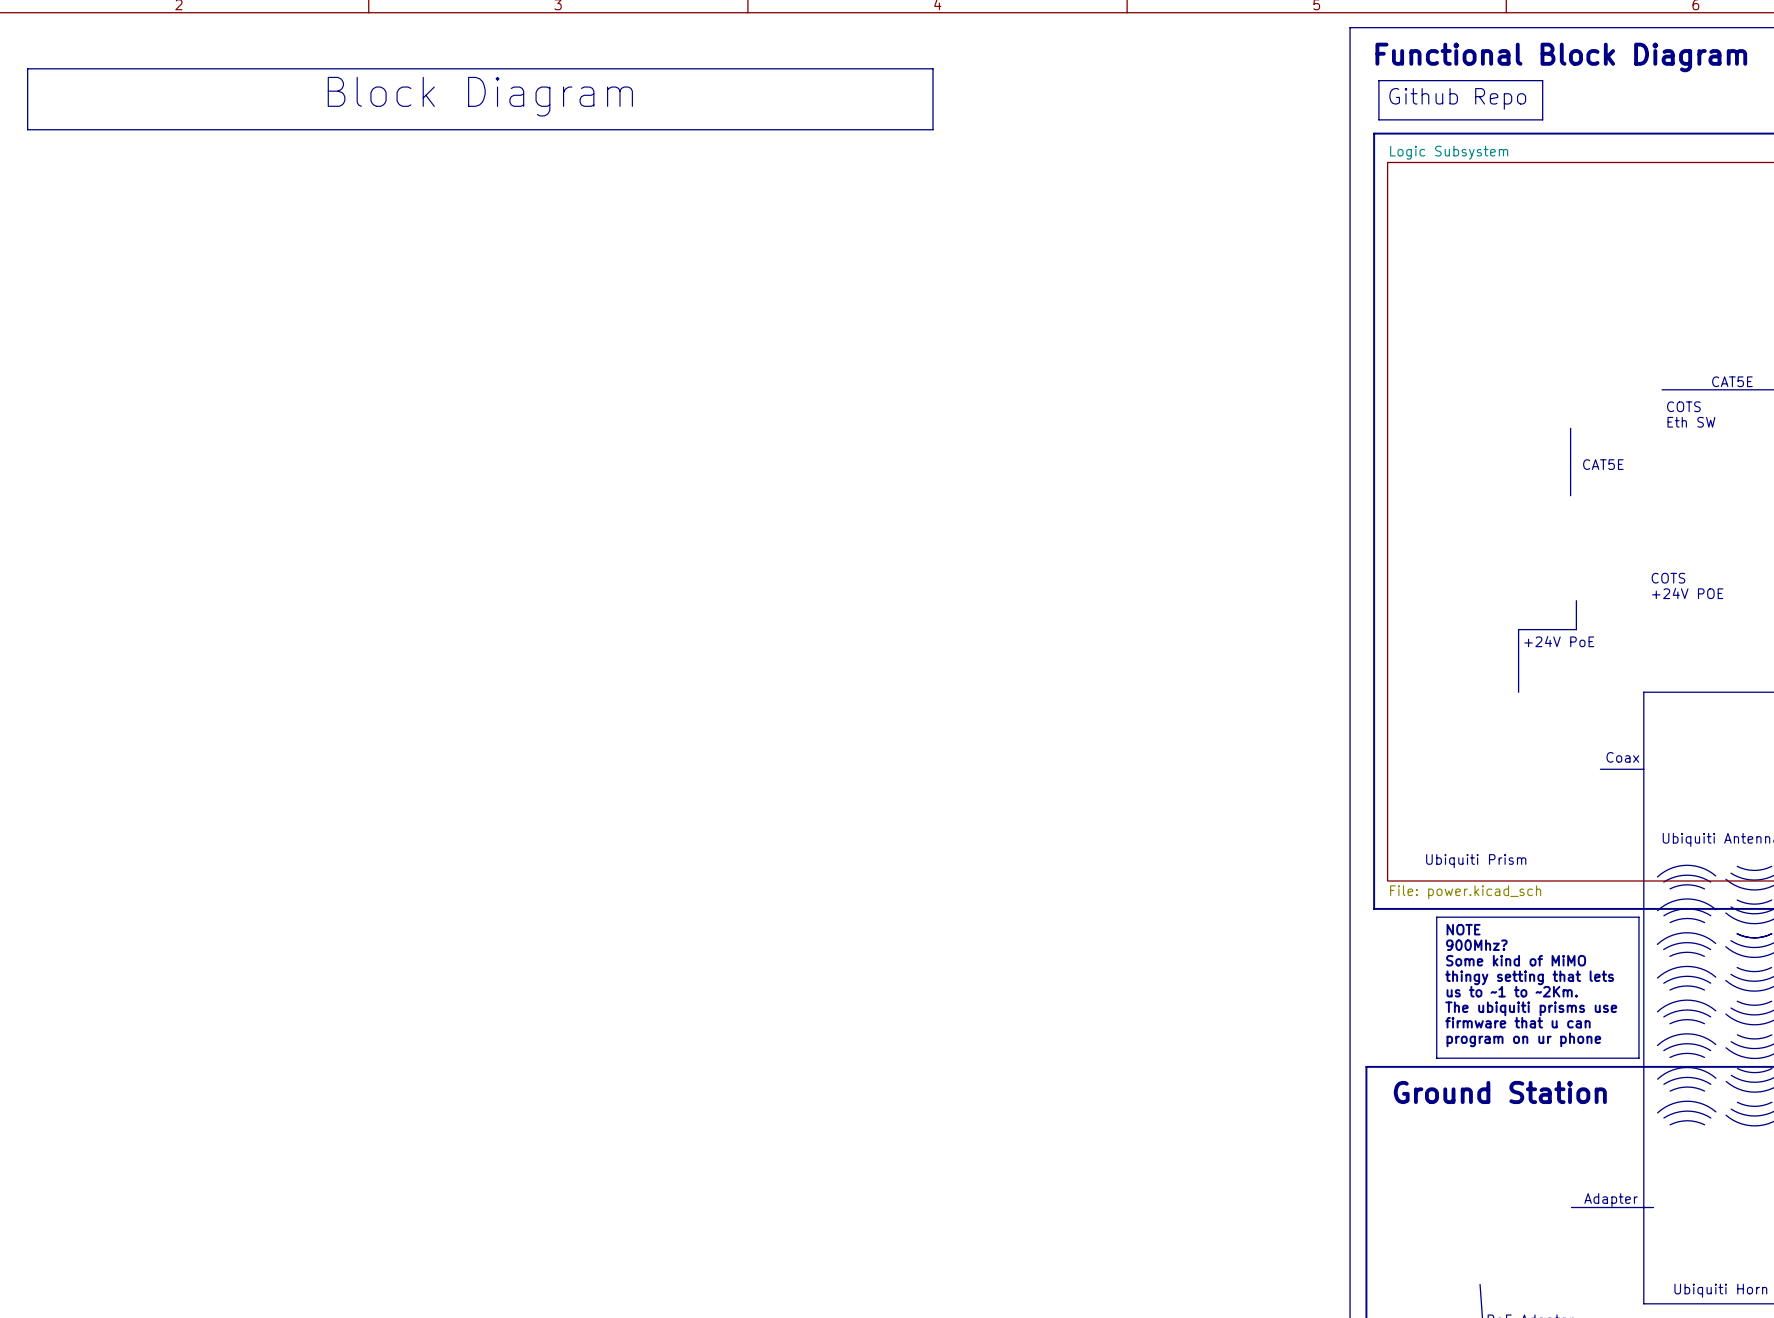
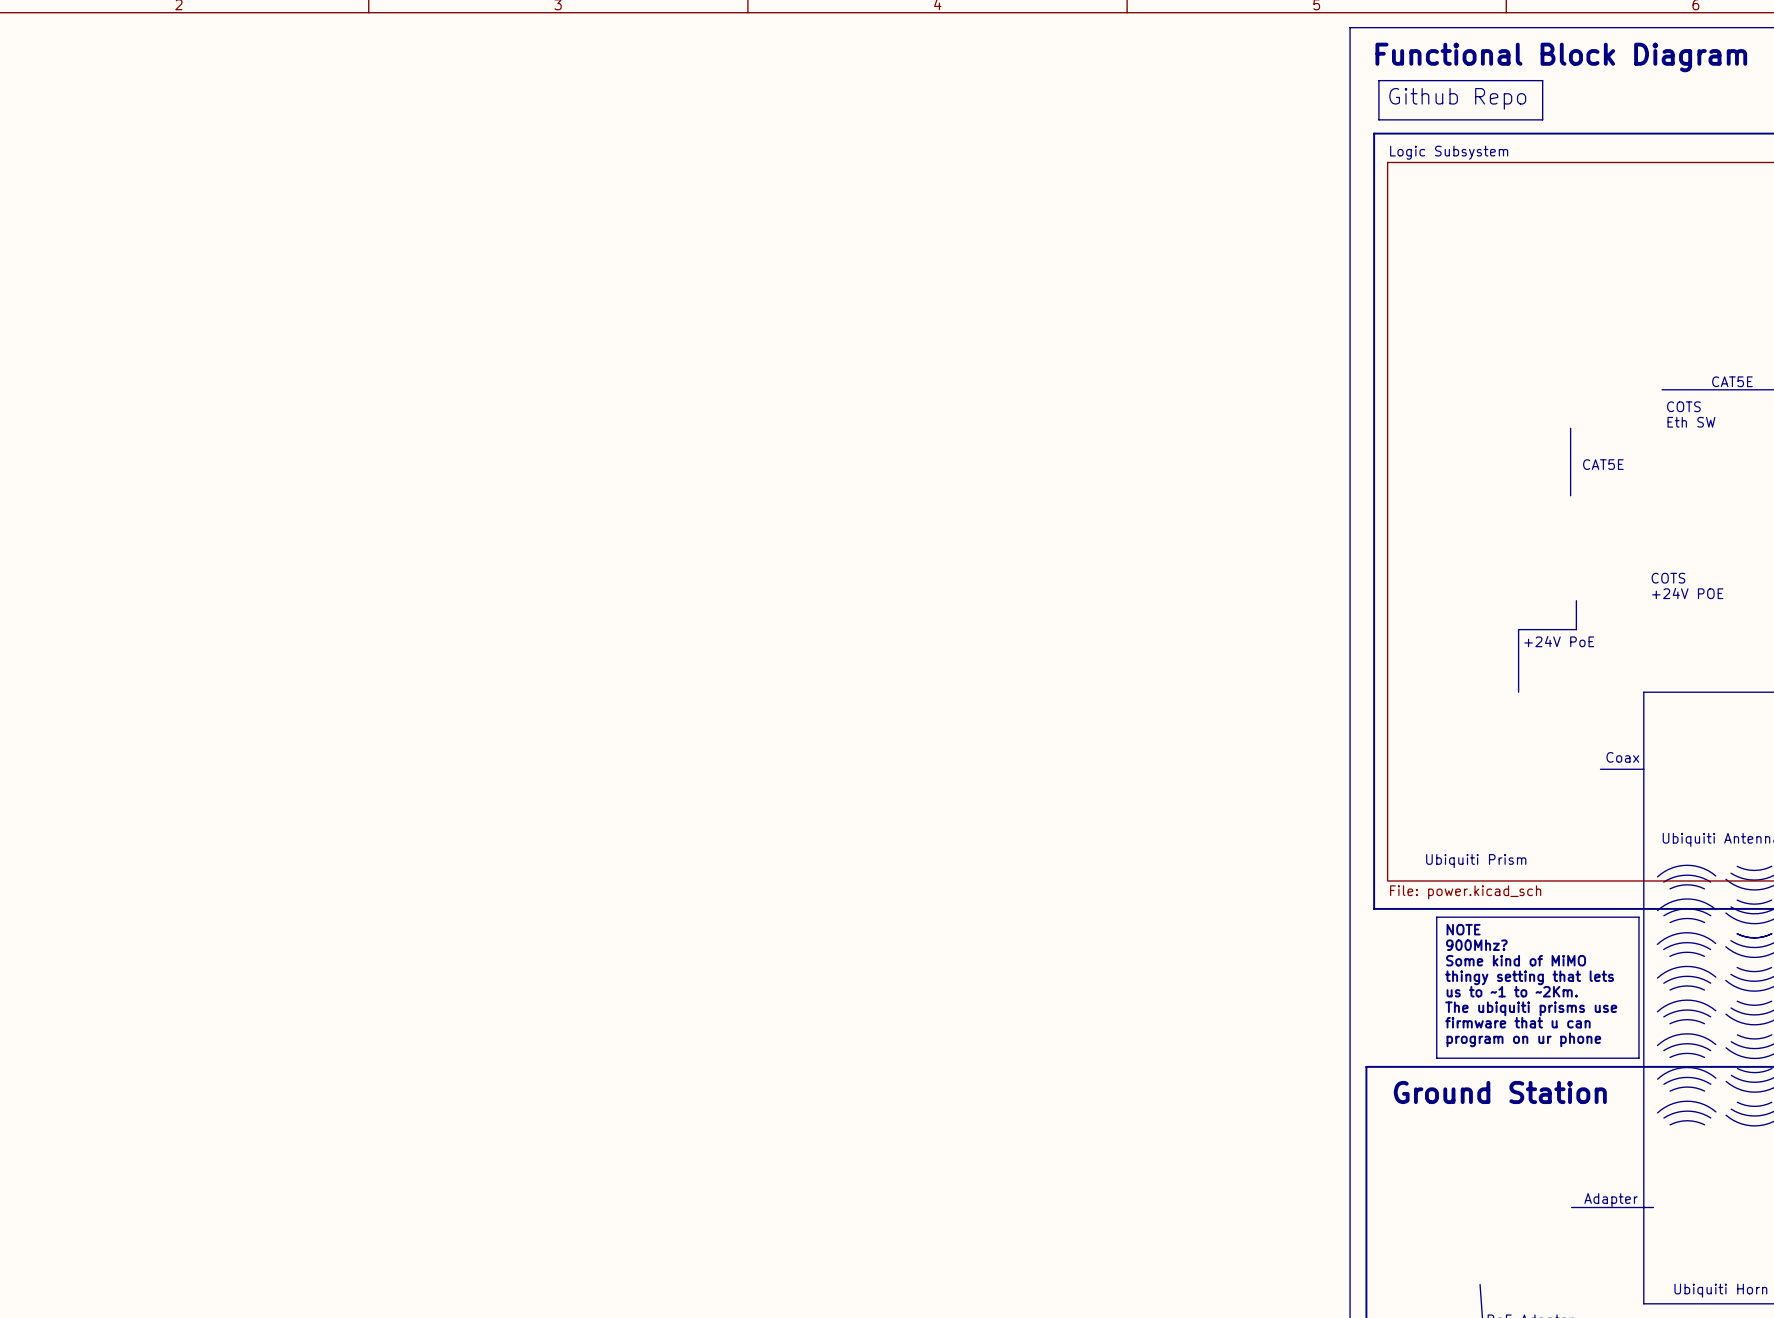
line: (27, 68) (933, 68) (933, 129) (27, 129) (27, 68) -> none
text: Block Diagram (480, 96) -> none

